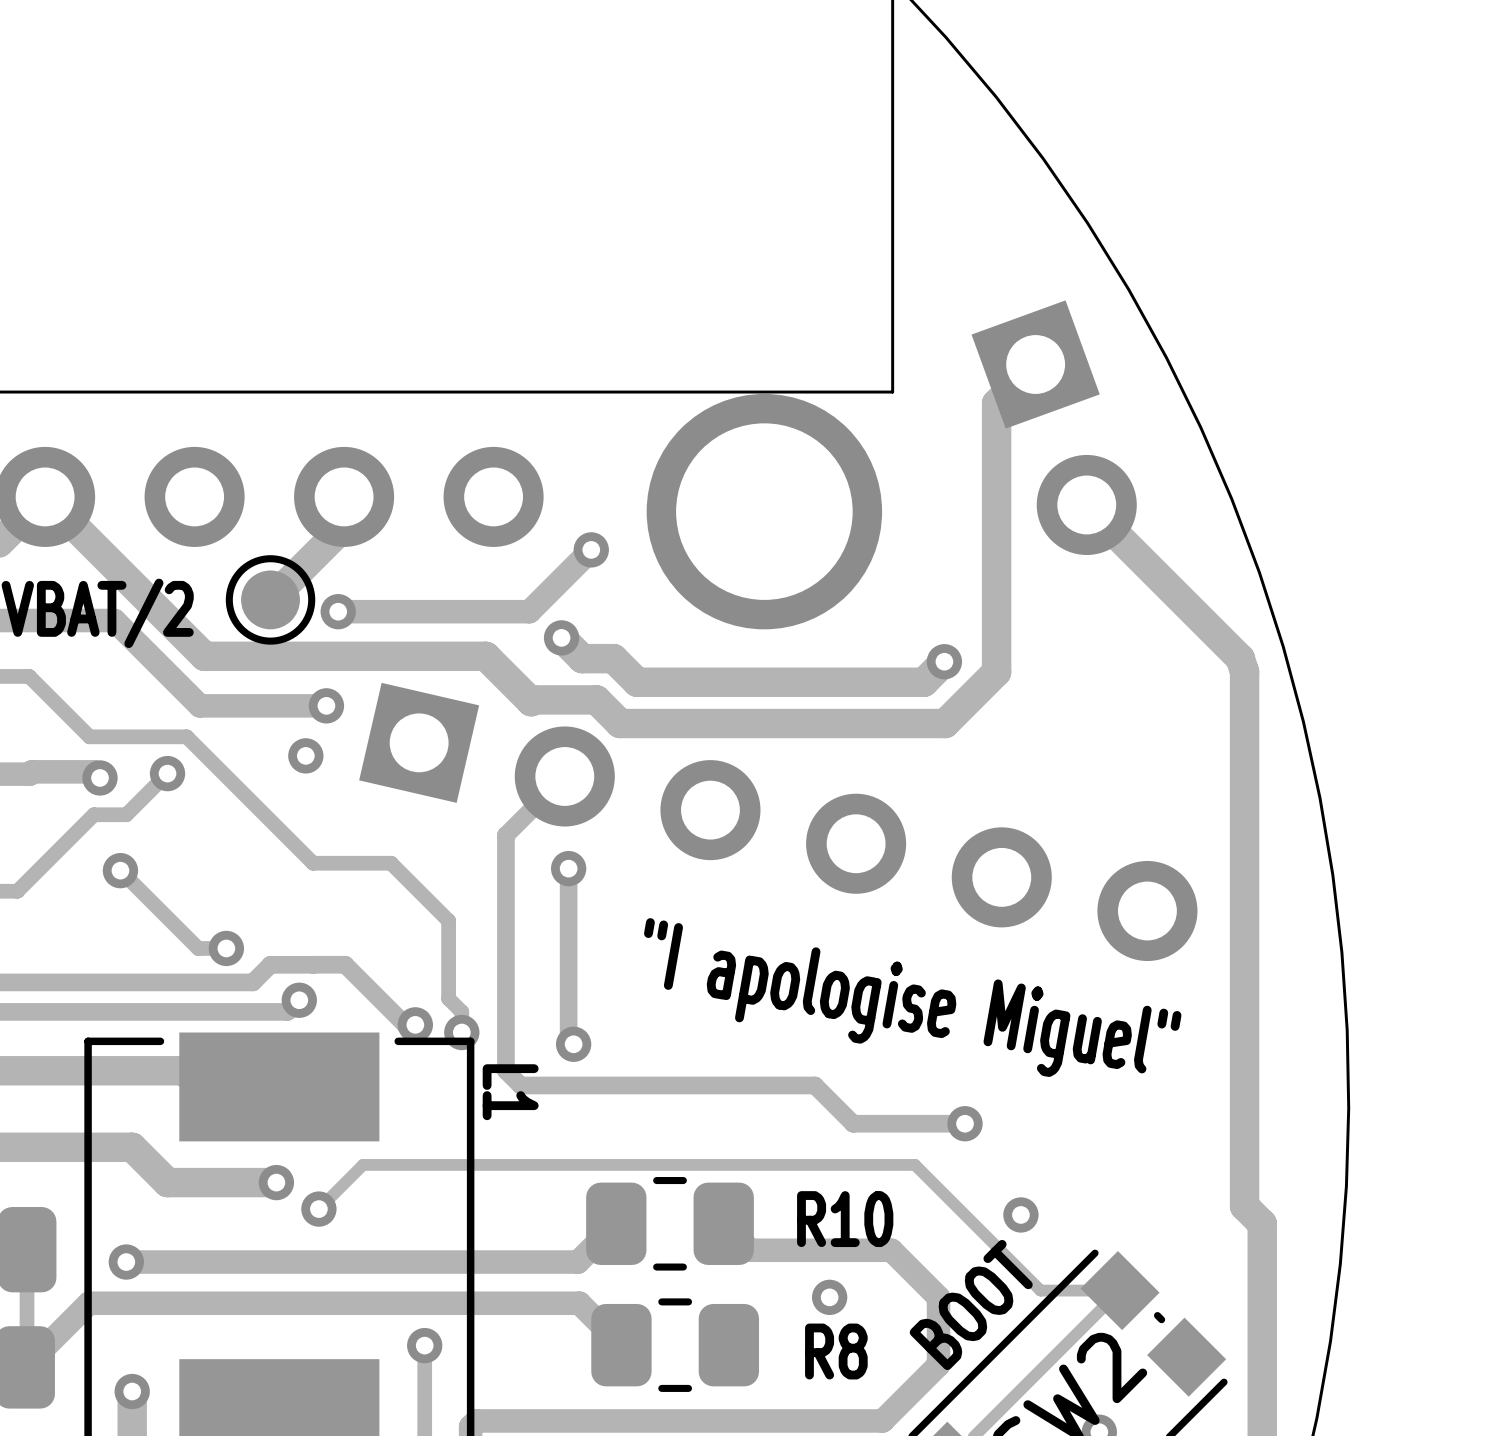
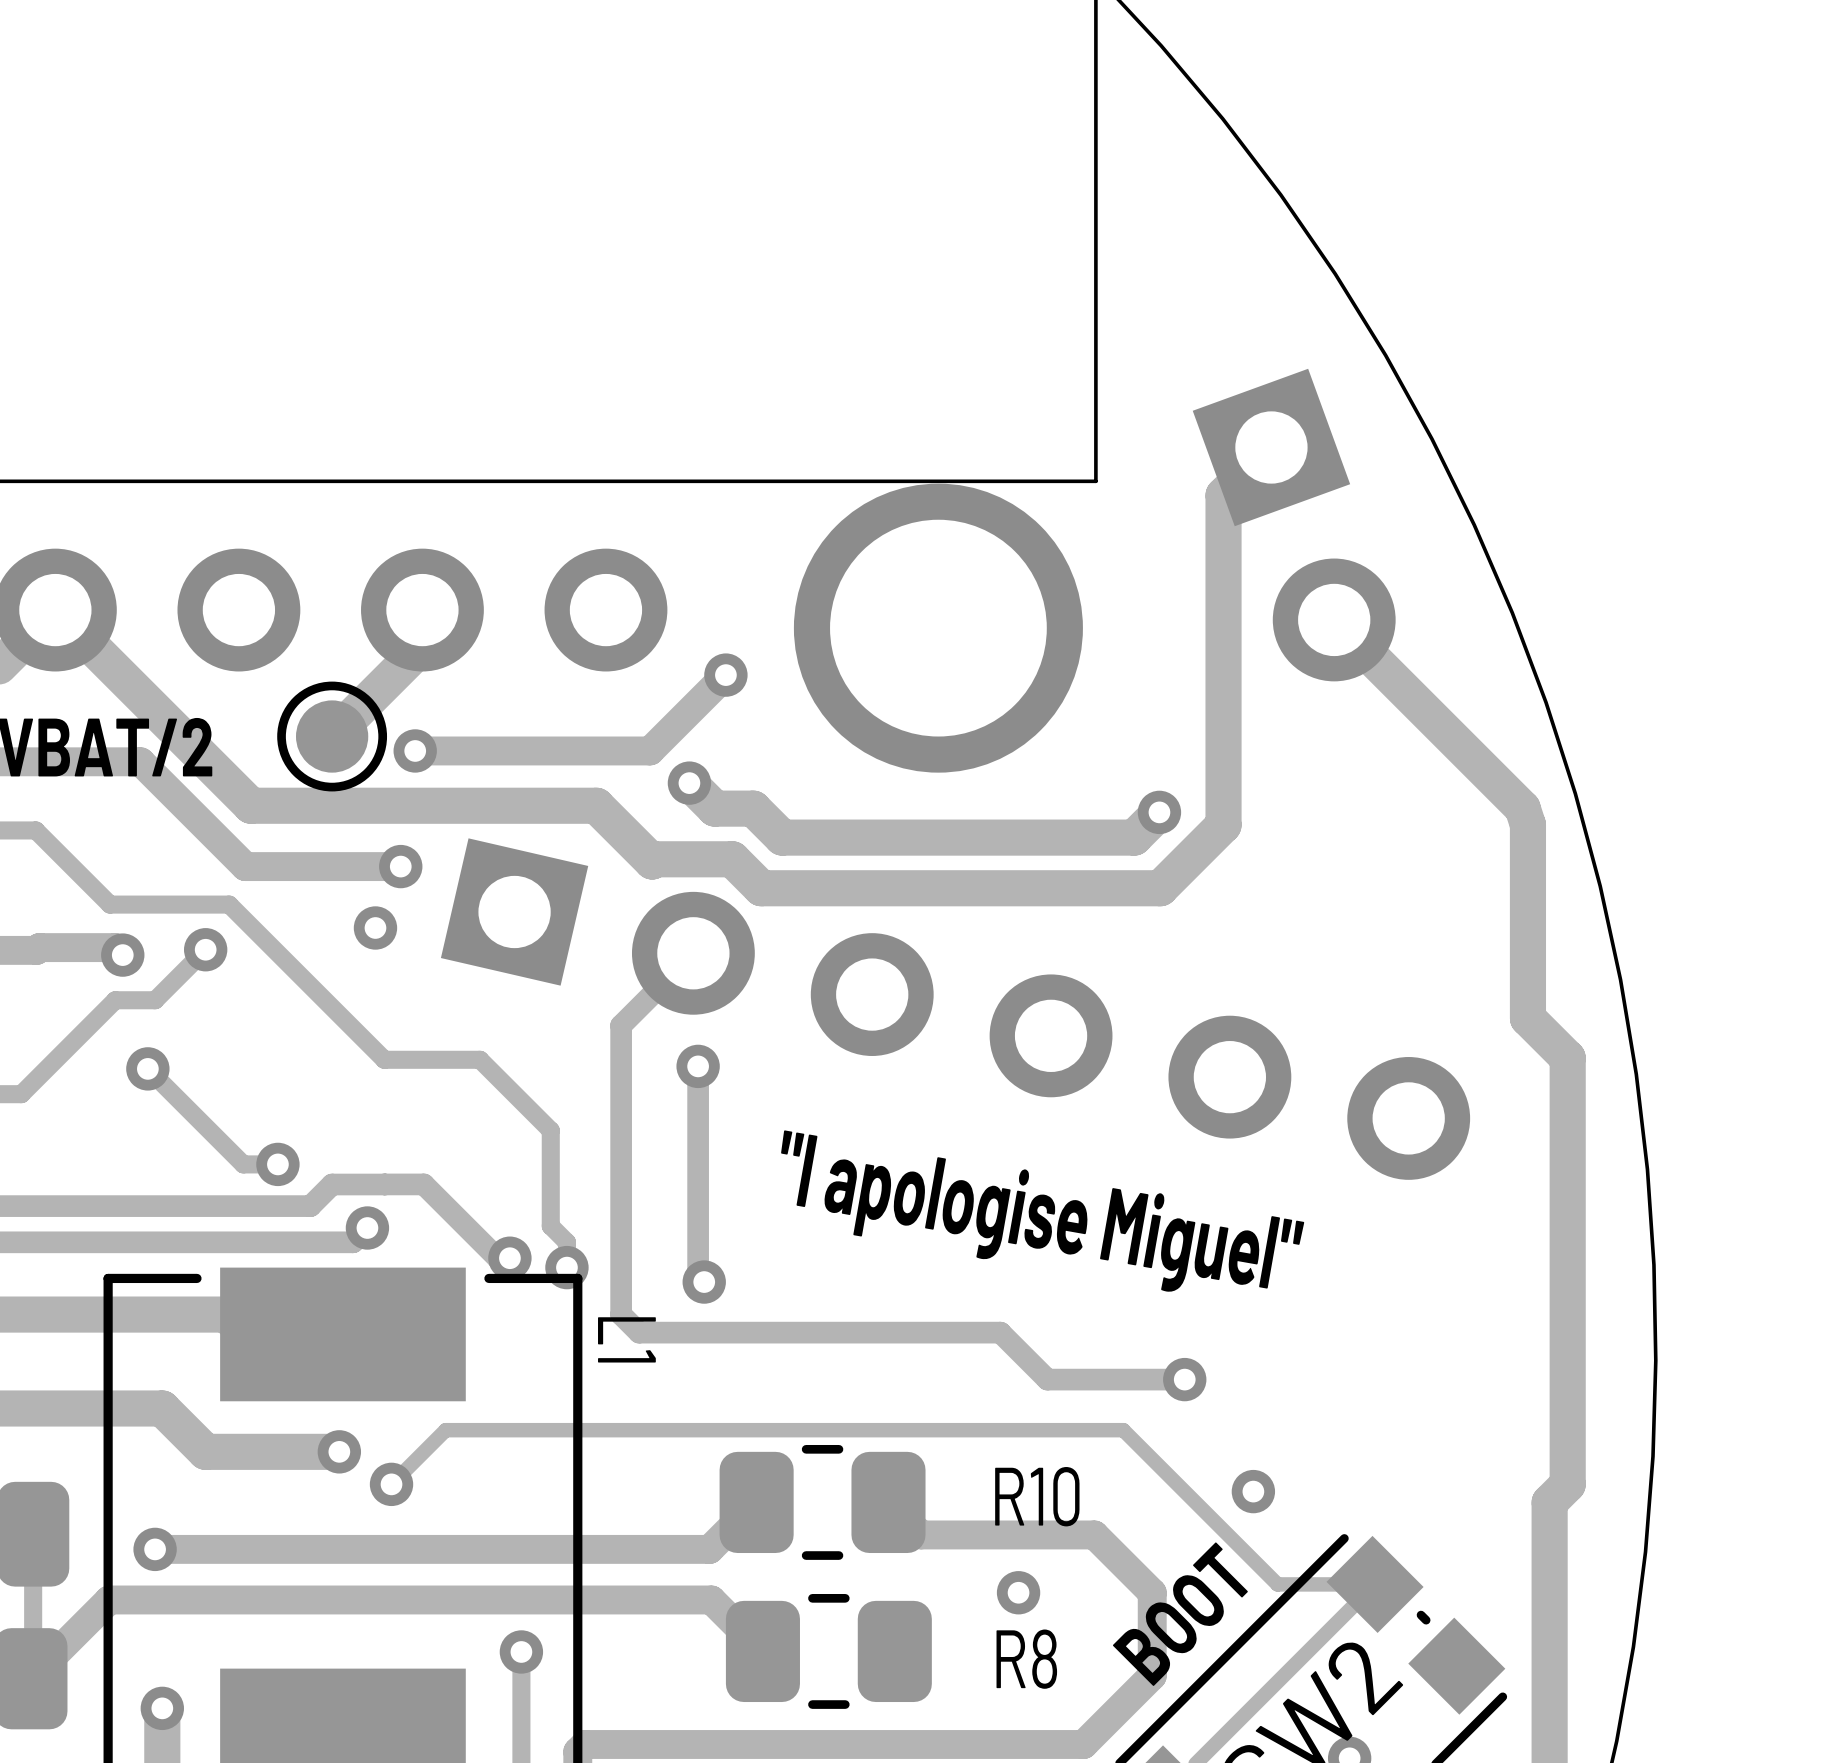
track: (1244, 829) (1244, 1206) (1262, 1223) -> (1527, 1018) (1567, 1058) (1567, 1484) (1549, 1502)

